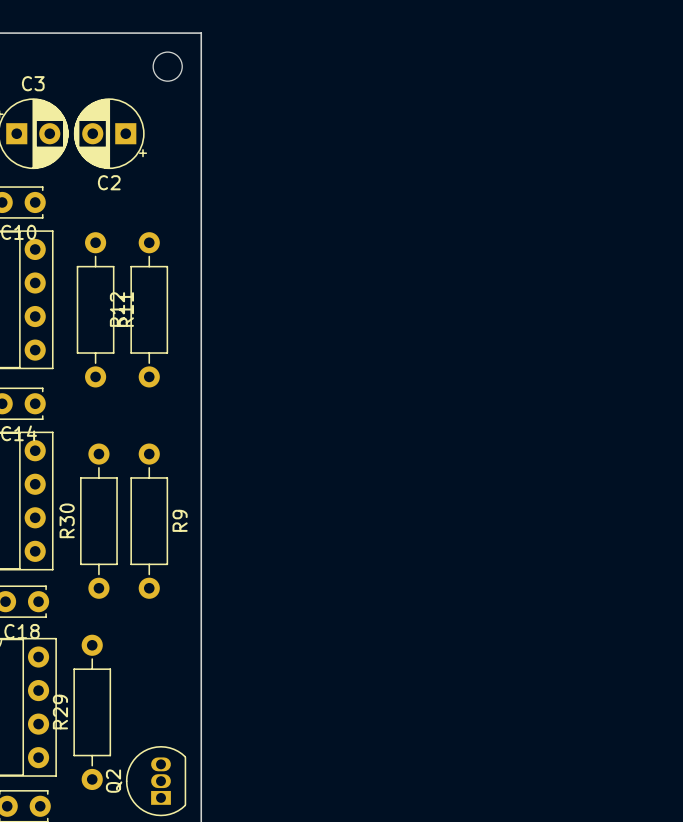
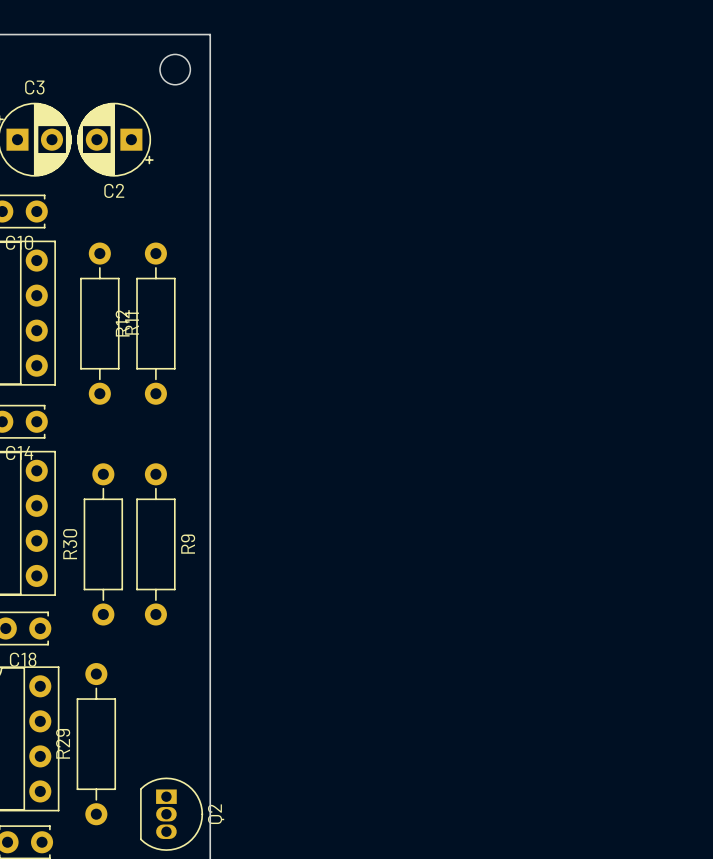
Q2 rotation: 0° (156, 781) -> 180° (171, 814)

